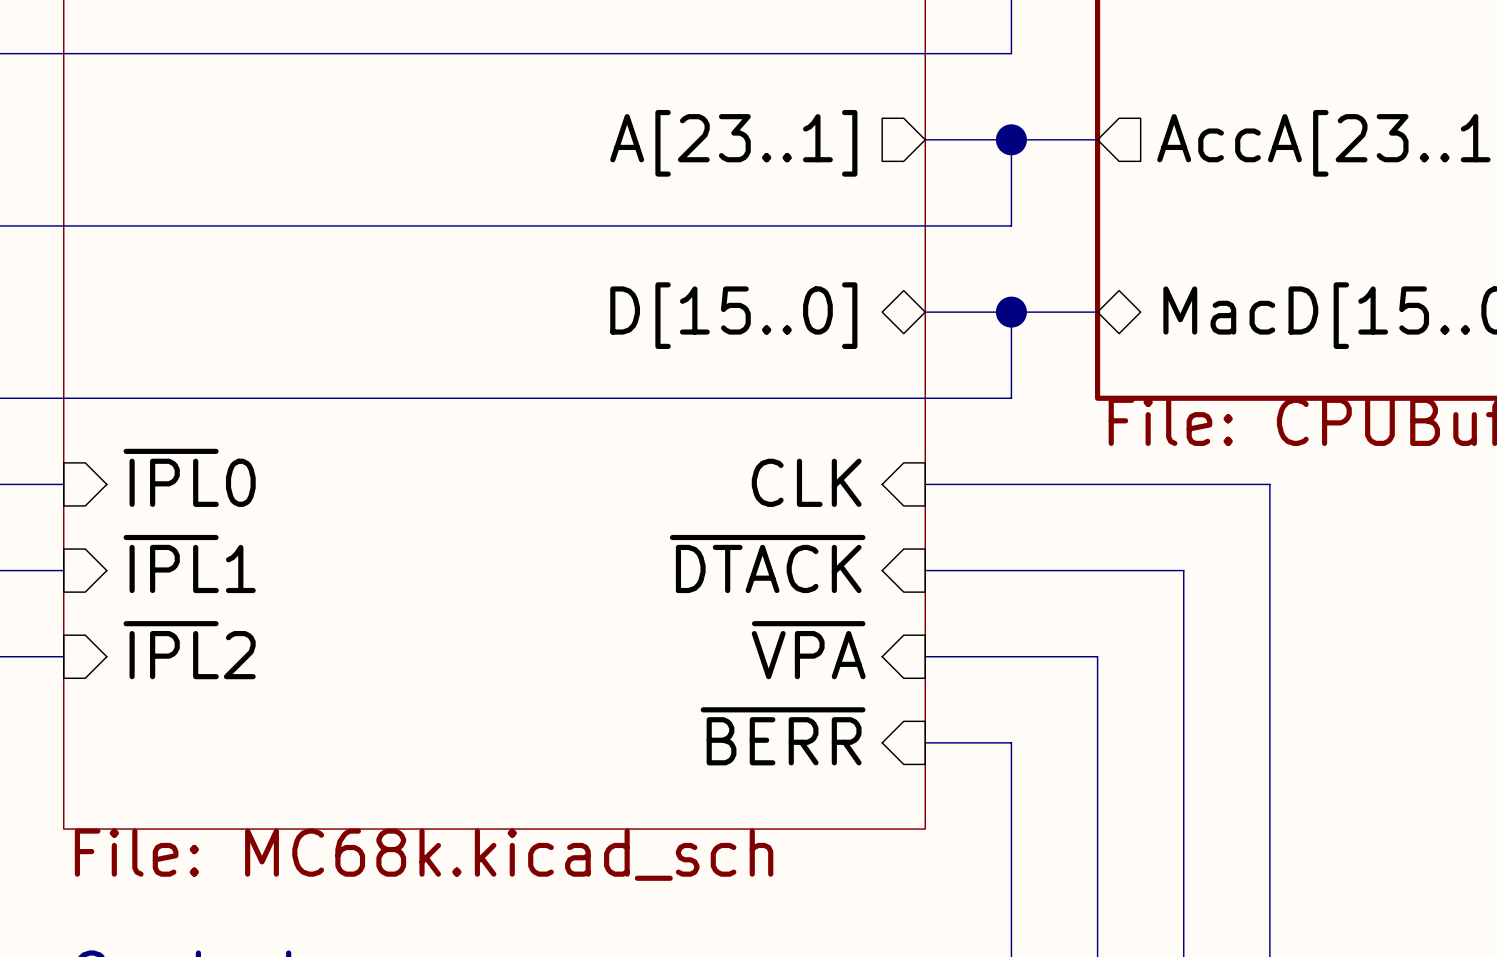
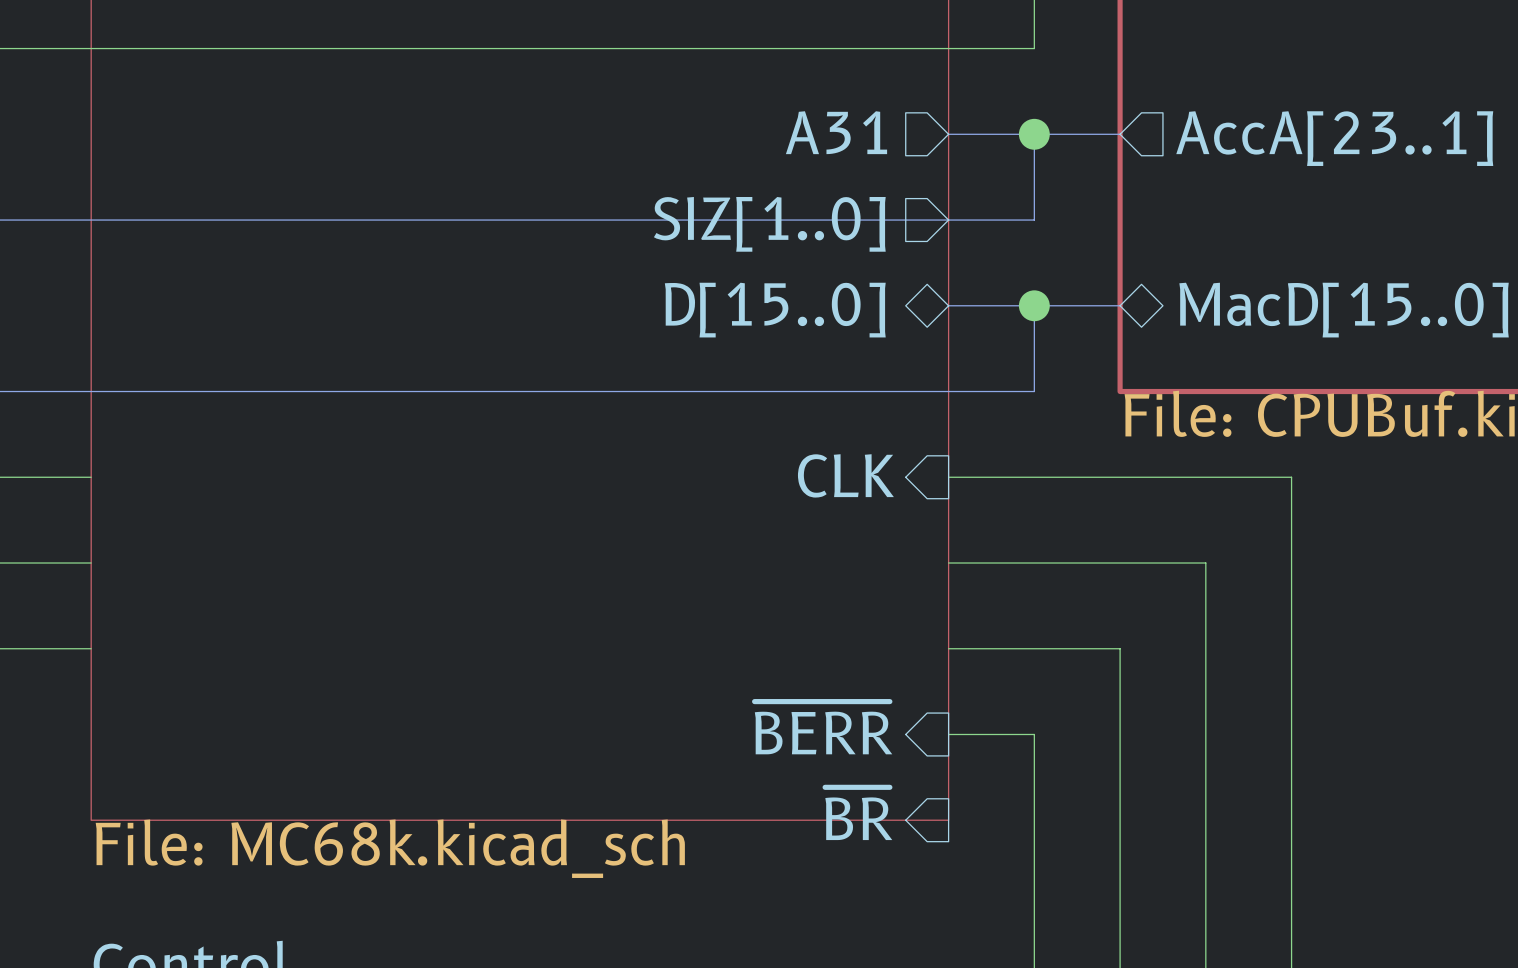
sheet pin: A[23..1] (733, 143) -> A31 (836, 132)
sheet pin: none -> SIZ[1..0] (769, 224)
sheet pin: ~{IPL}0 (189, 477) -> none
sheet pin: ~{IPL}1 (189, 564) -> none
sheet pin: ~{DTACK} (767, 564) -> none
sheet pin: ~{IPL}2 (189, 650) -> none
sheet pin: ~{VPA} (808, 650) -> none
sheet pin: none -> ~{BR} (858, 813)

